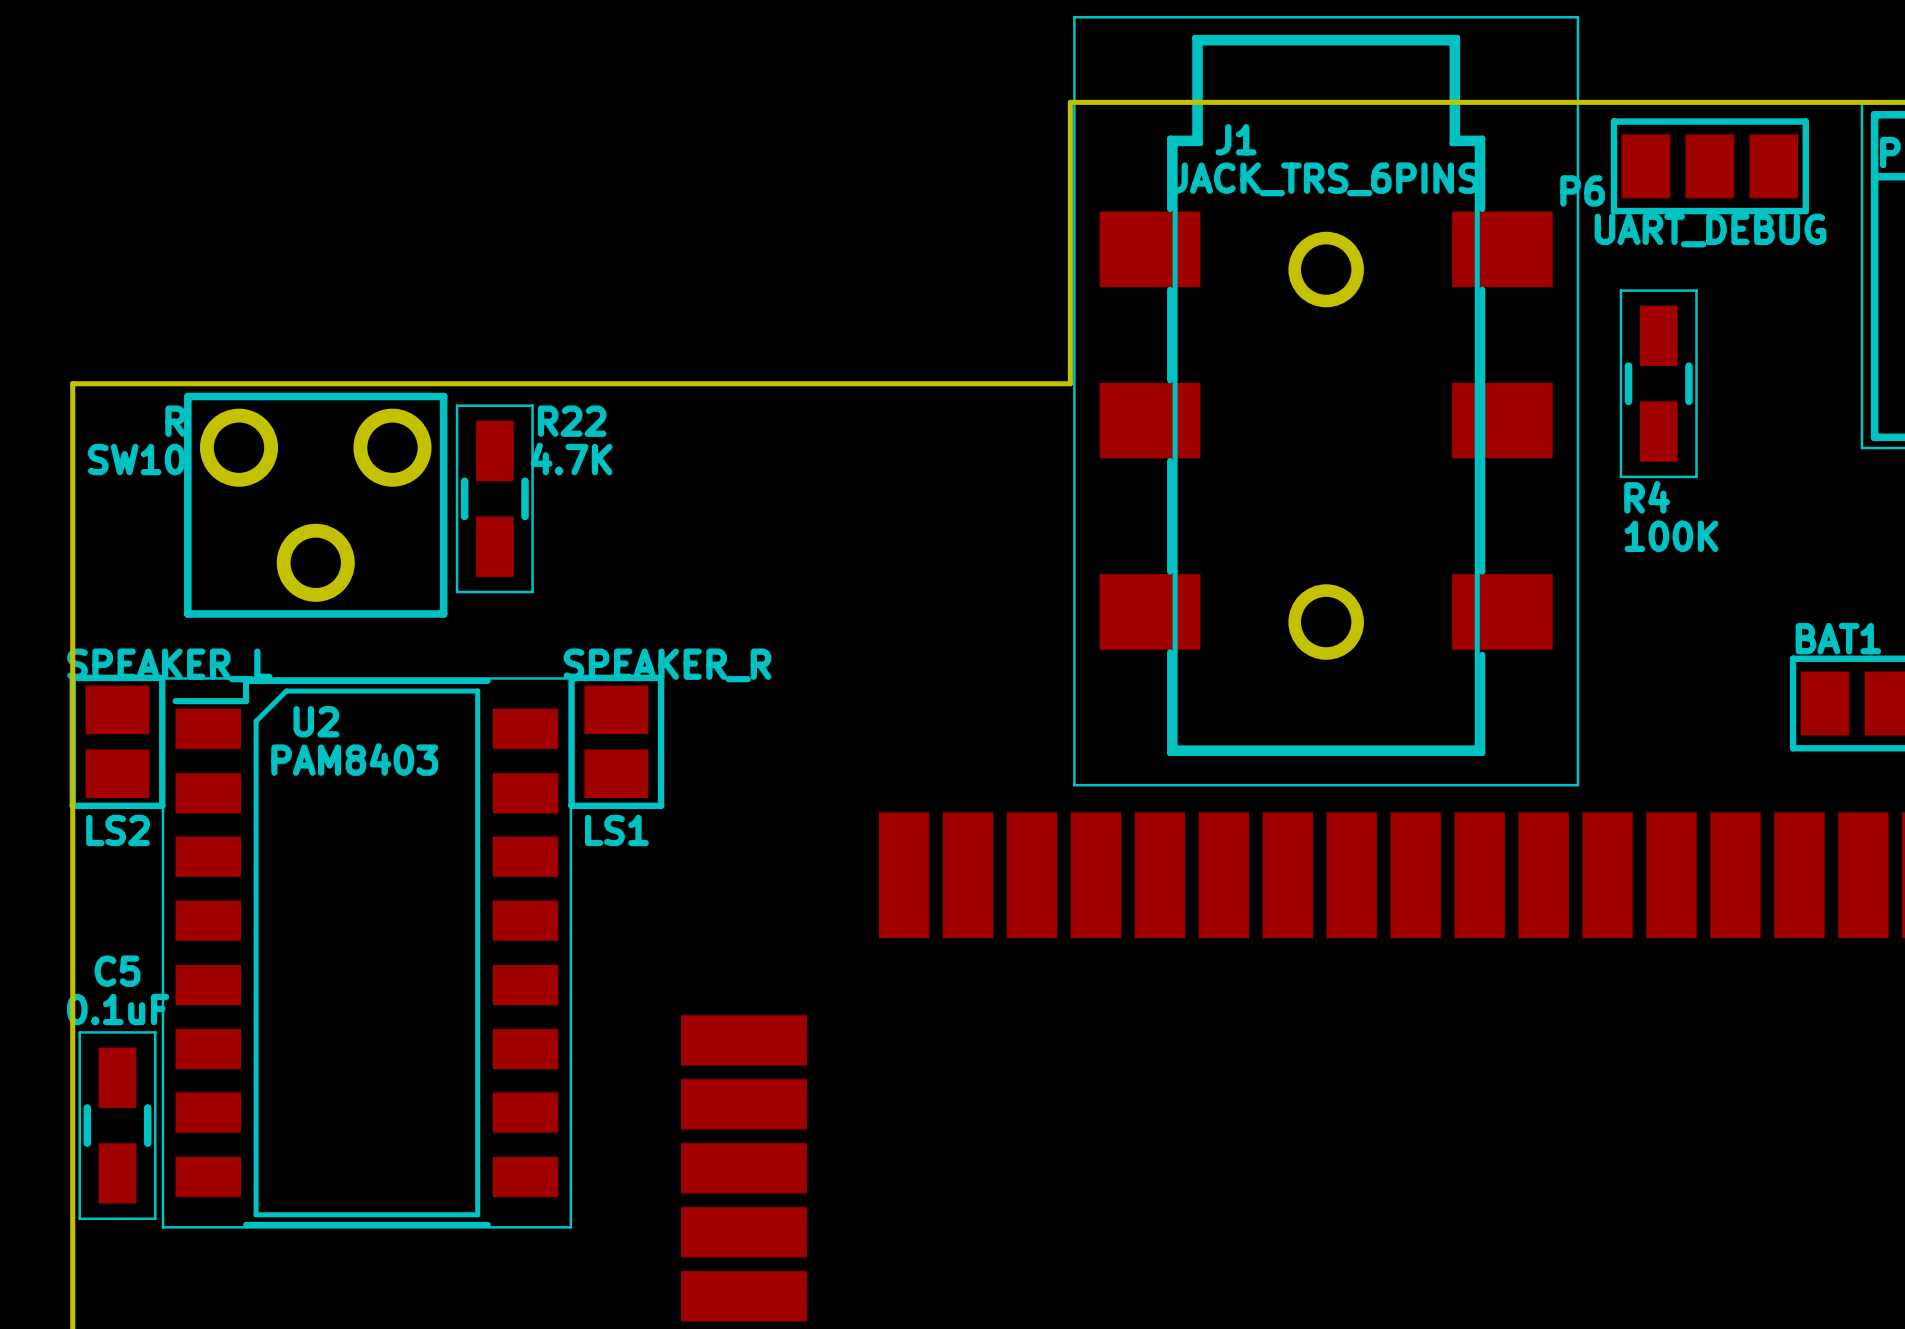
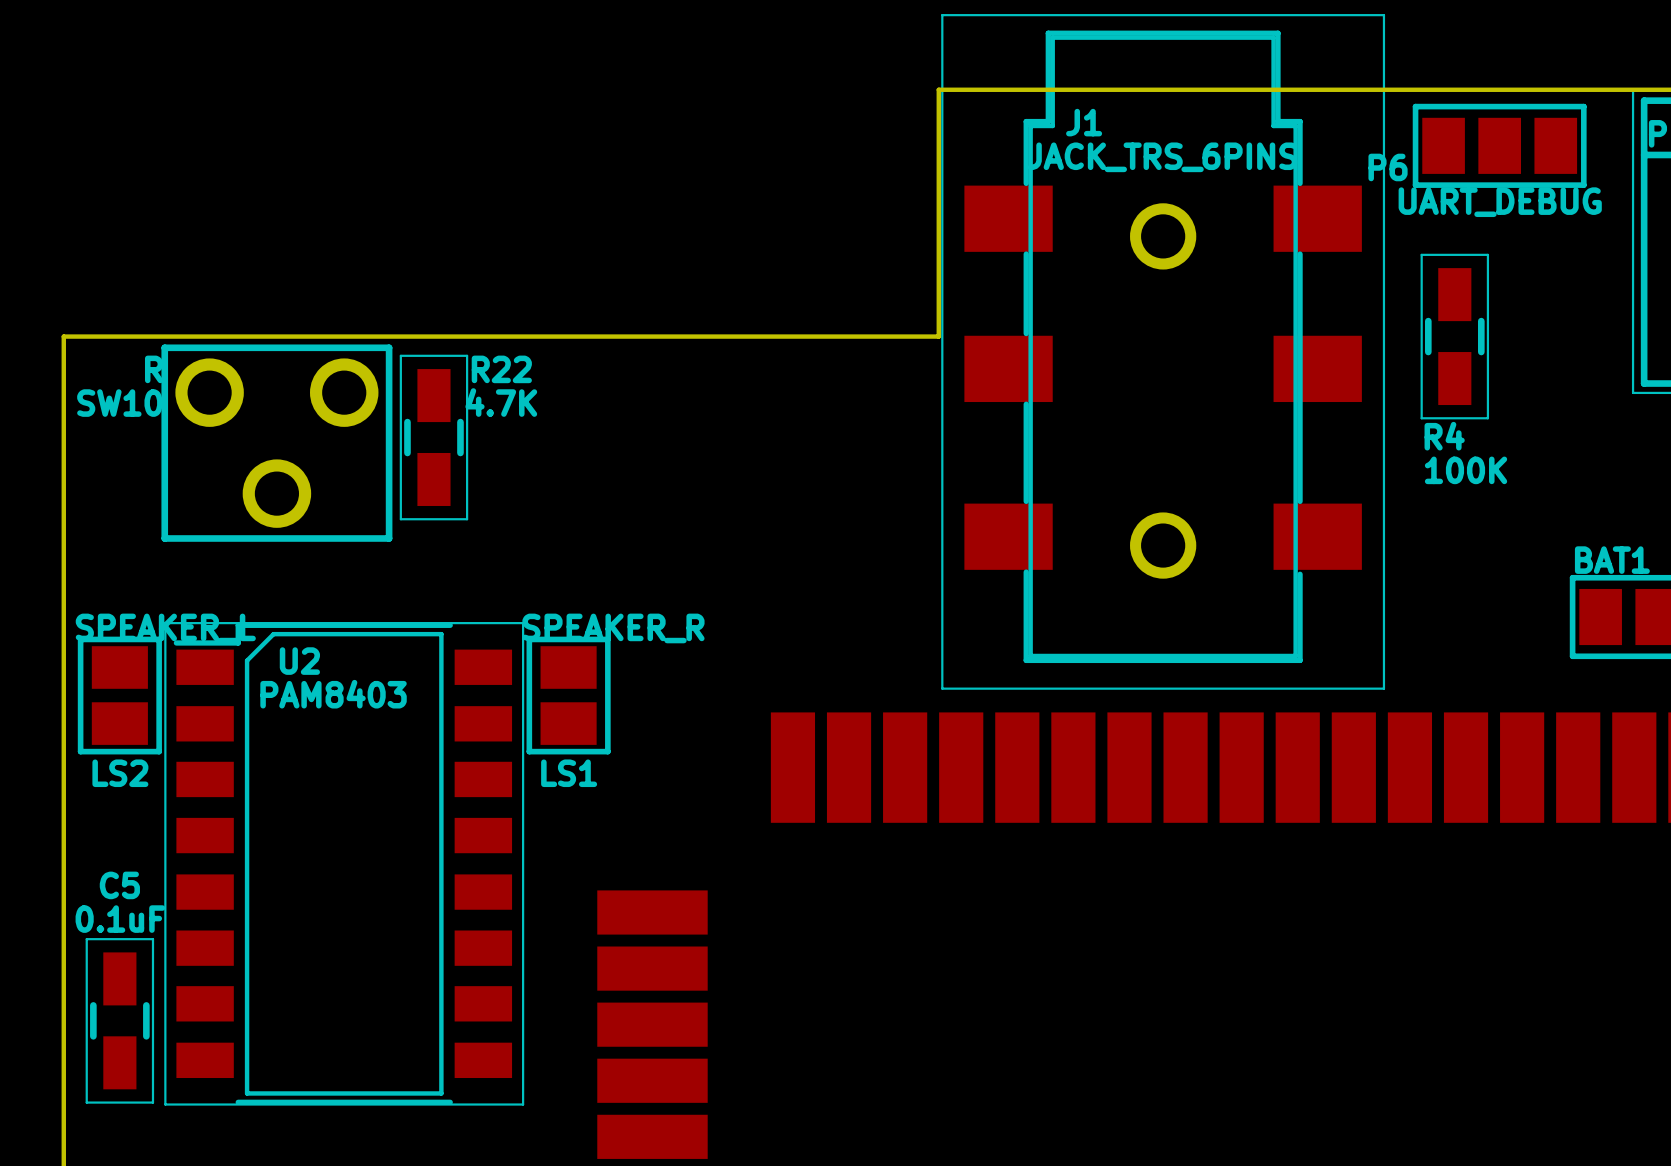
LS2 position: (117, 741) -> (119, 695)
LS1 position: (616, 741) -> (568, 695)
U2 position: (366, 952) -> (344, 863)
C5 position: (117, 1125) -> (119, 1020)

